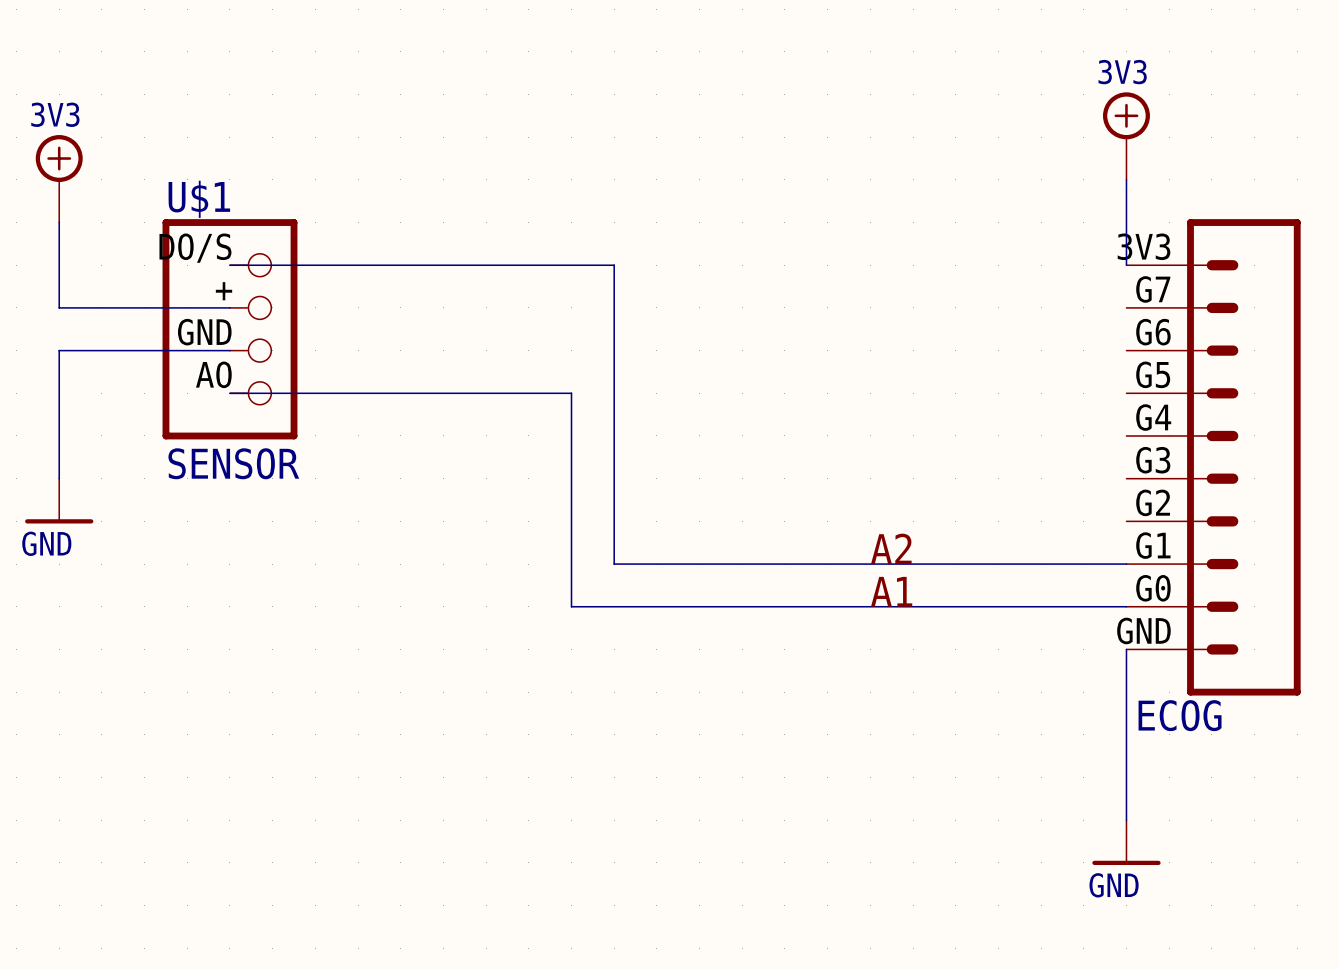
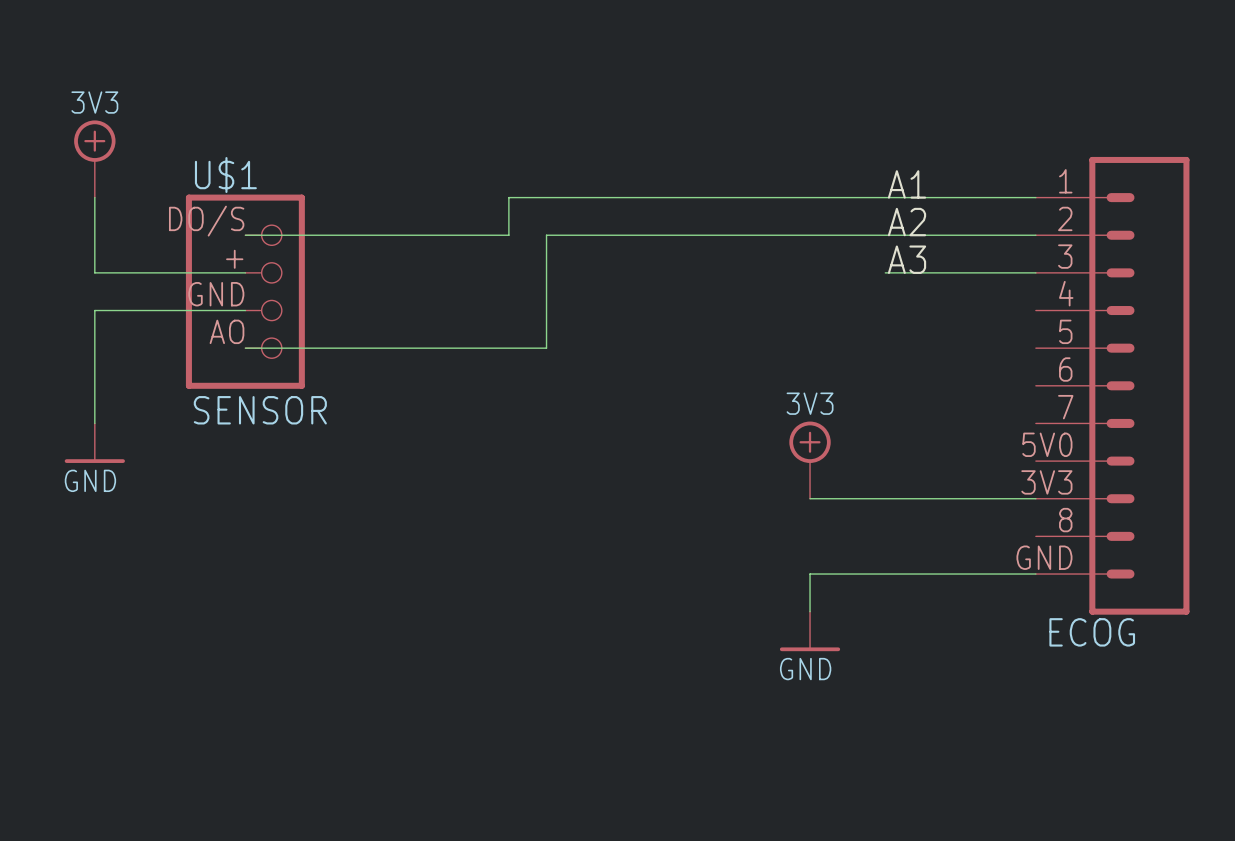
power symbol: 3V3 (1126, 136) -> none
wire: (1126, 179) (1126, 265) -> none
wire: none -> (1035, 197) (508, 197) (508, 235)
wire: (528, 265) (571, 265) -> (546, 348) (546, 235)
wire: (614, 265) (614, 564) (870, 564) -> (584, 235) (1035, 235)
label: none -> A3 (907, 259)
wire: none -> (885, 272) (1035, 272)
wire: (571, 393) (571, 606) (1126, 606) -> none
ECOG: none -> (1112, 385)
ECOG: (1213, 457) -> none
power symbol: none -> 3V3 (810, 460)
label position: A2 (891, 548) -> A2 (907, 222)
label position: A1 (891, 591) -> A1 (907, 184)
wire: (1126, 649) (1126, 820) -> (1035, 574) (810, 574) (810, 611)
power symbol position: GND (1126, 842) -> GND (810, 631)

